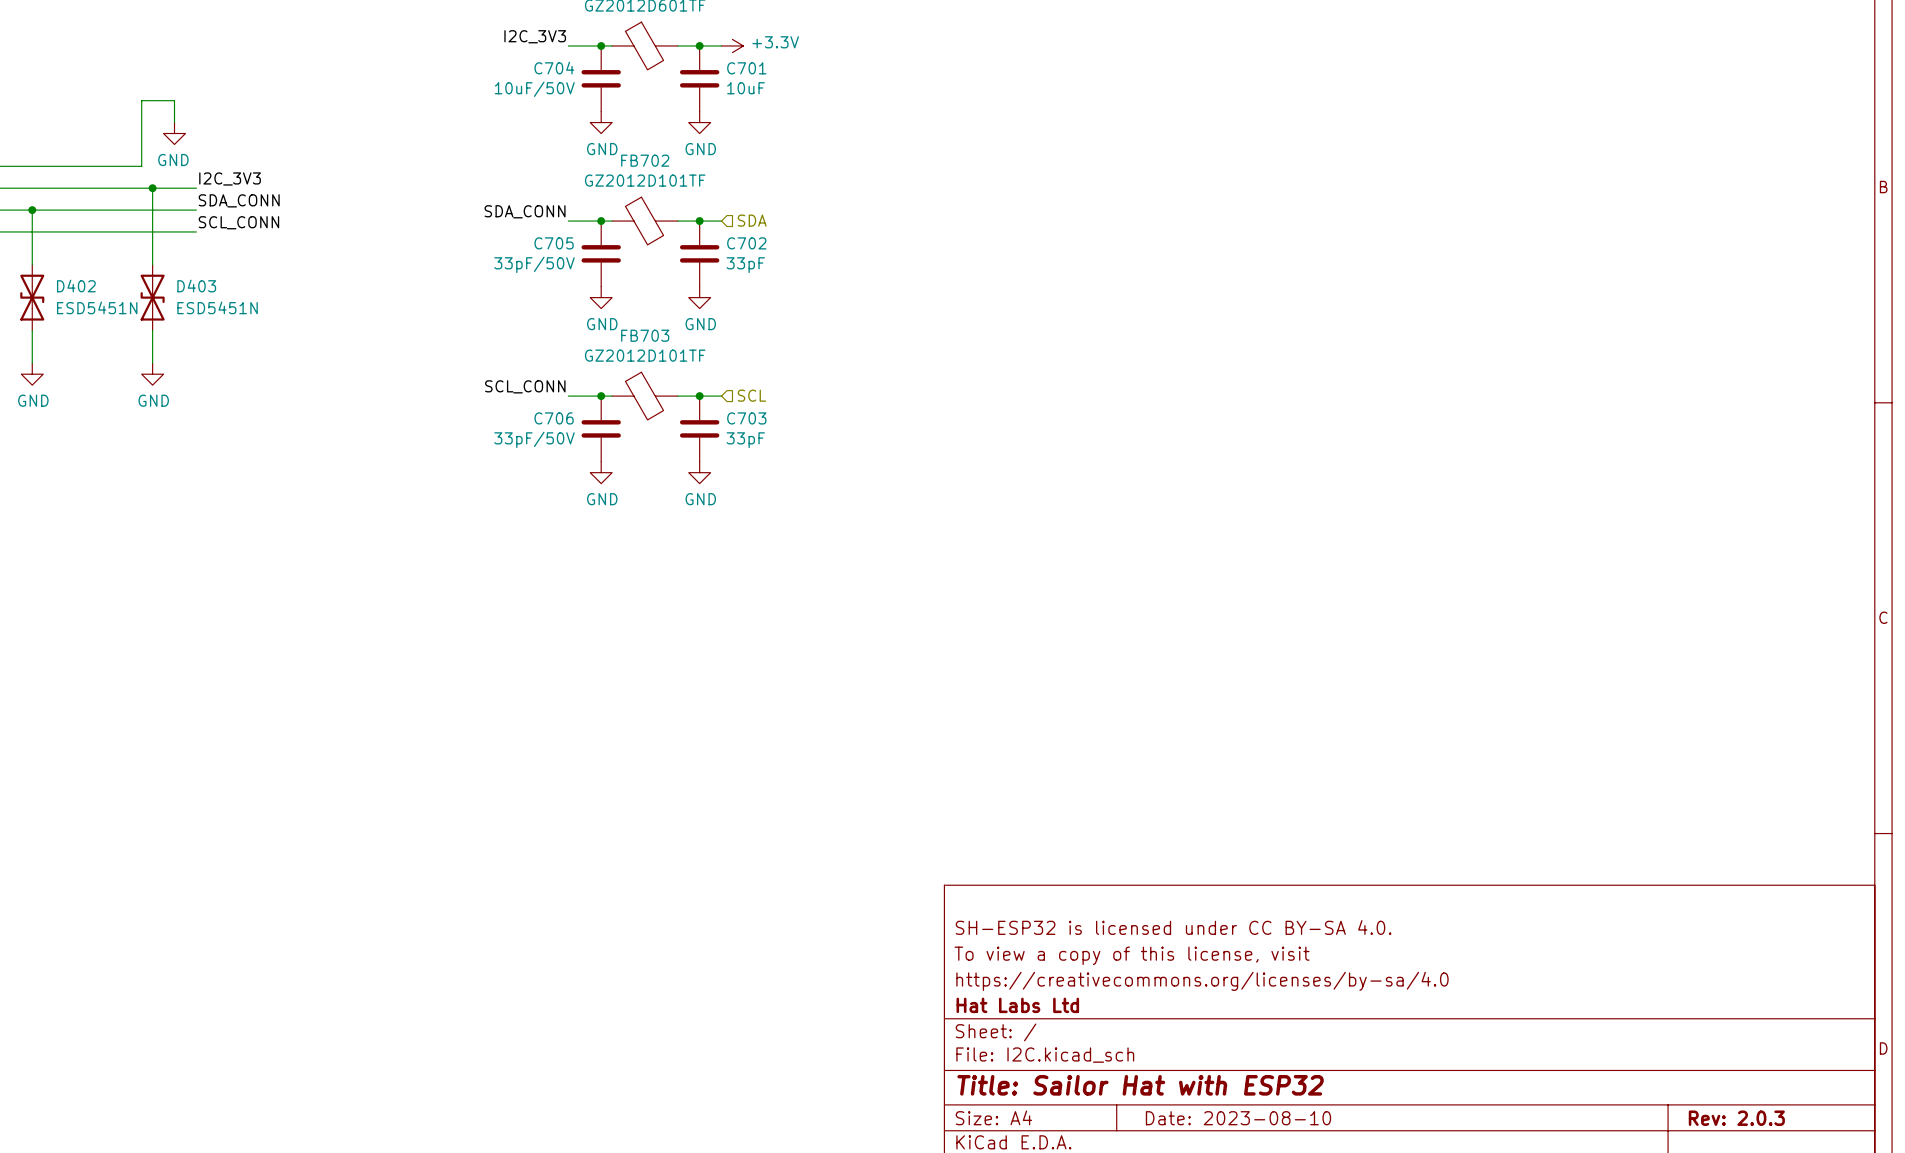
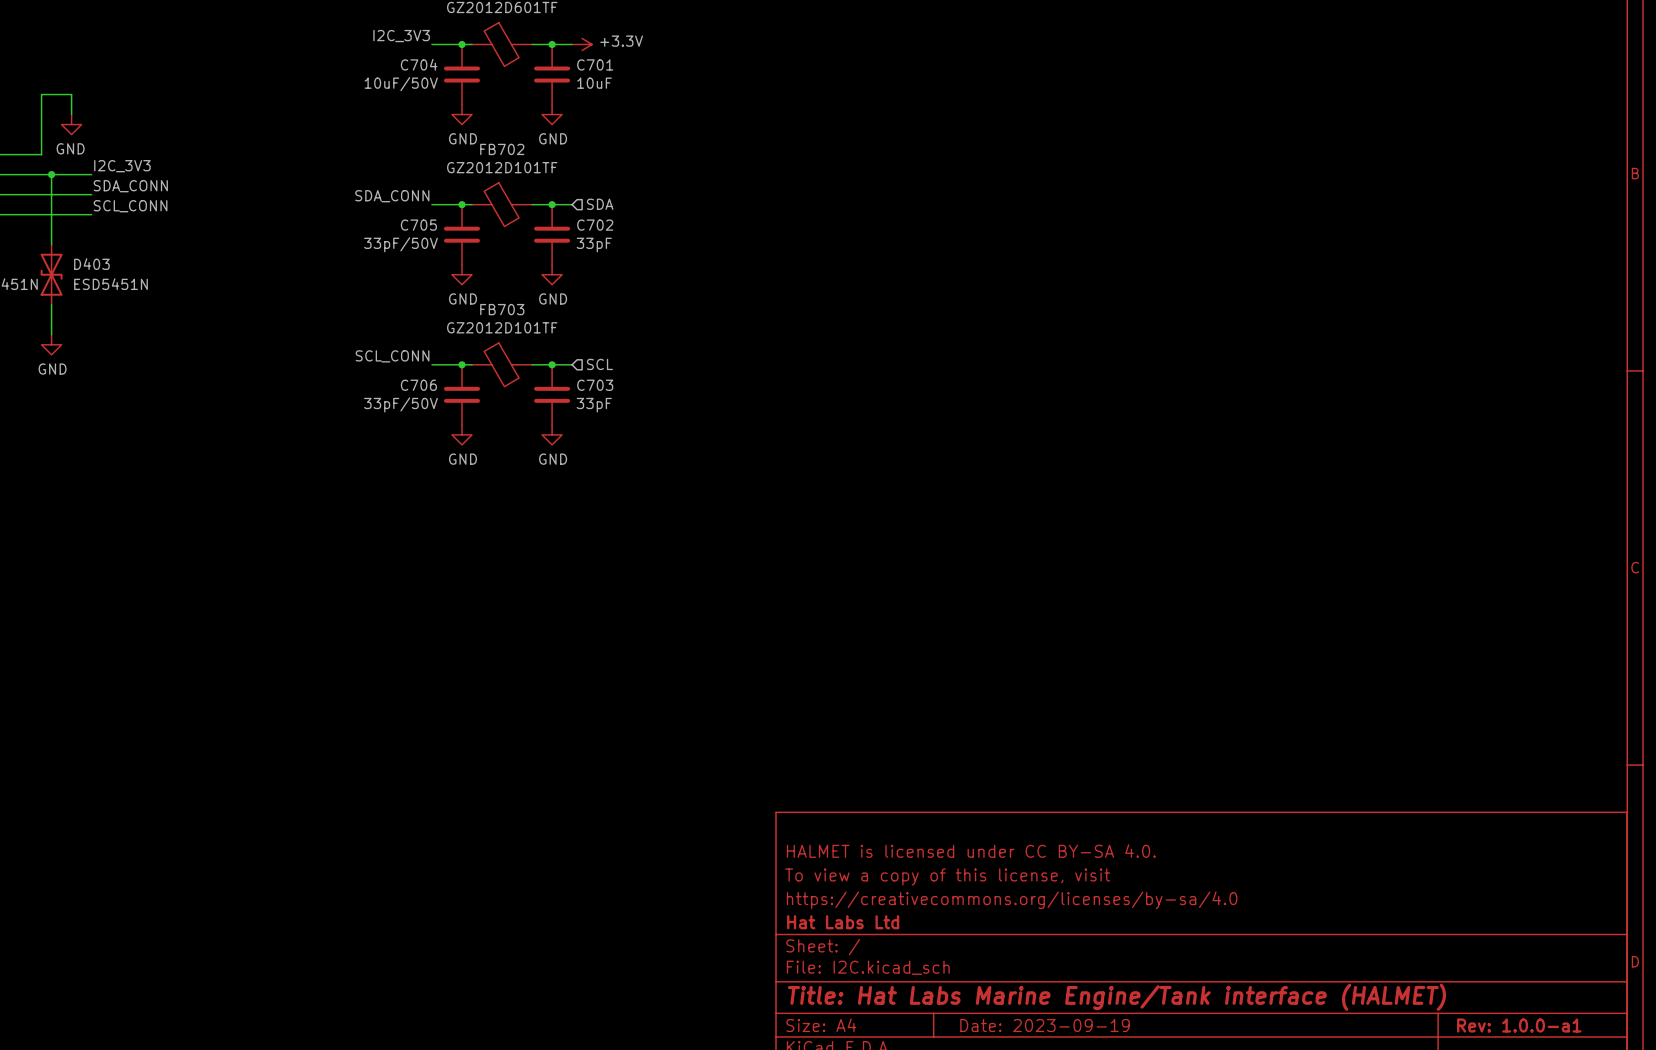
title block: SH-ESP32 is licensed under CC BY-SA 4.0. (1173, 927) -> HALMET is licensed under CC BY-SA 4.0. (971, 851)
title block: Title: Sailor Hat with ESP32 (1140, 1085) -> Title: Hat Labs Marine Engine/Tank interface (HALMET) (1116, 997)
title block: Date: 2023-08-10 (1238, 1118) -> Date: 2023-09-19 (1045, 1025)
title block: Rev: 2.0.3 (1736, 1118) -> Rev: 1.0.0-a1 (1519, 1025)

